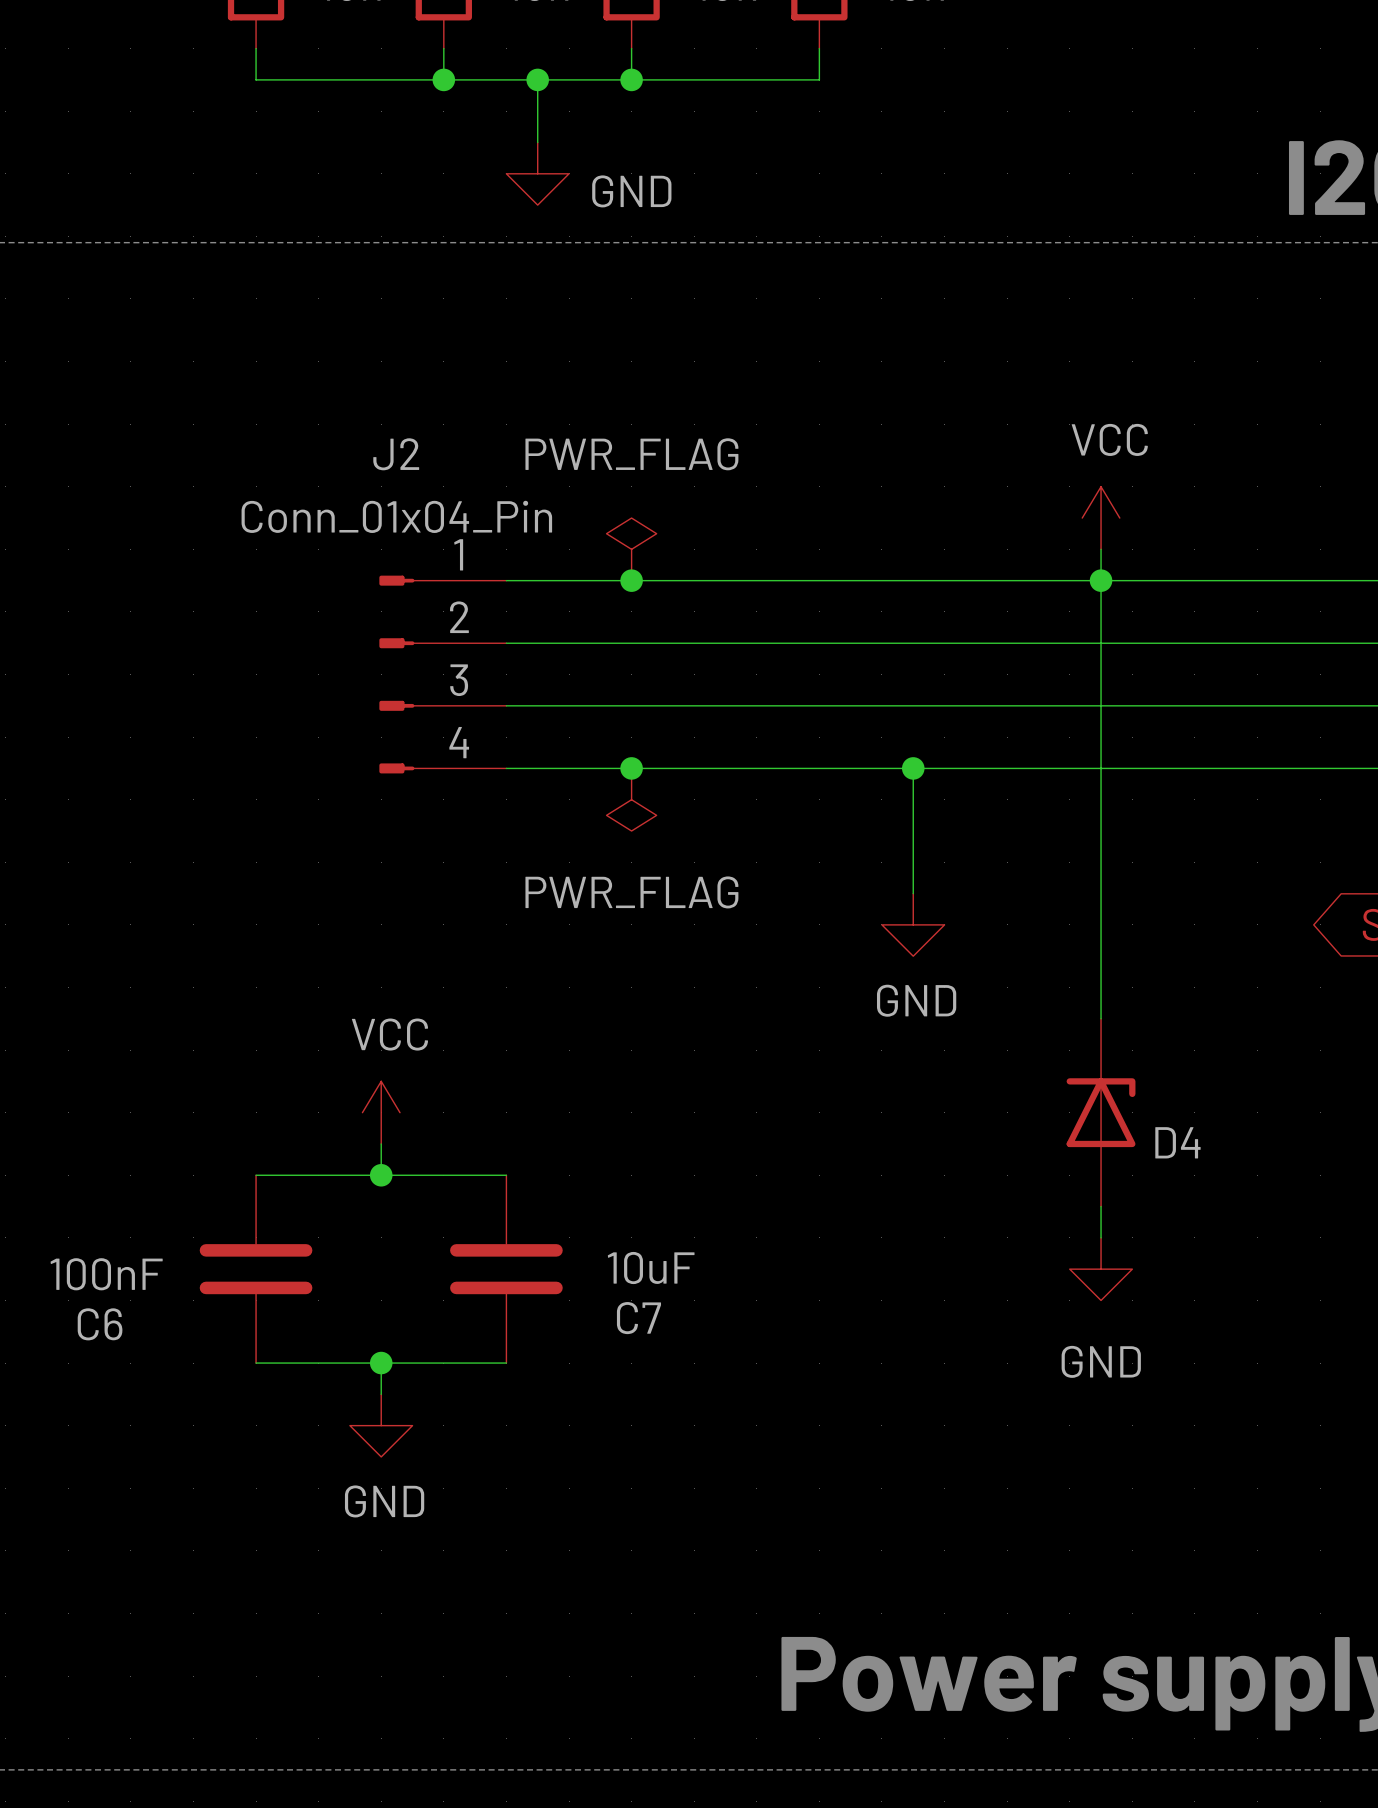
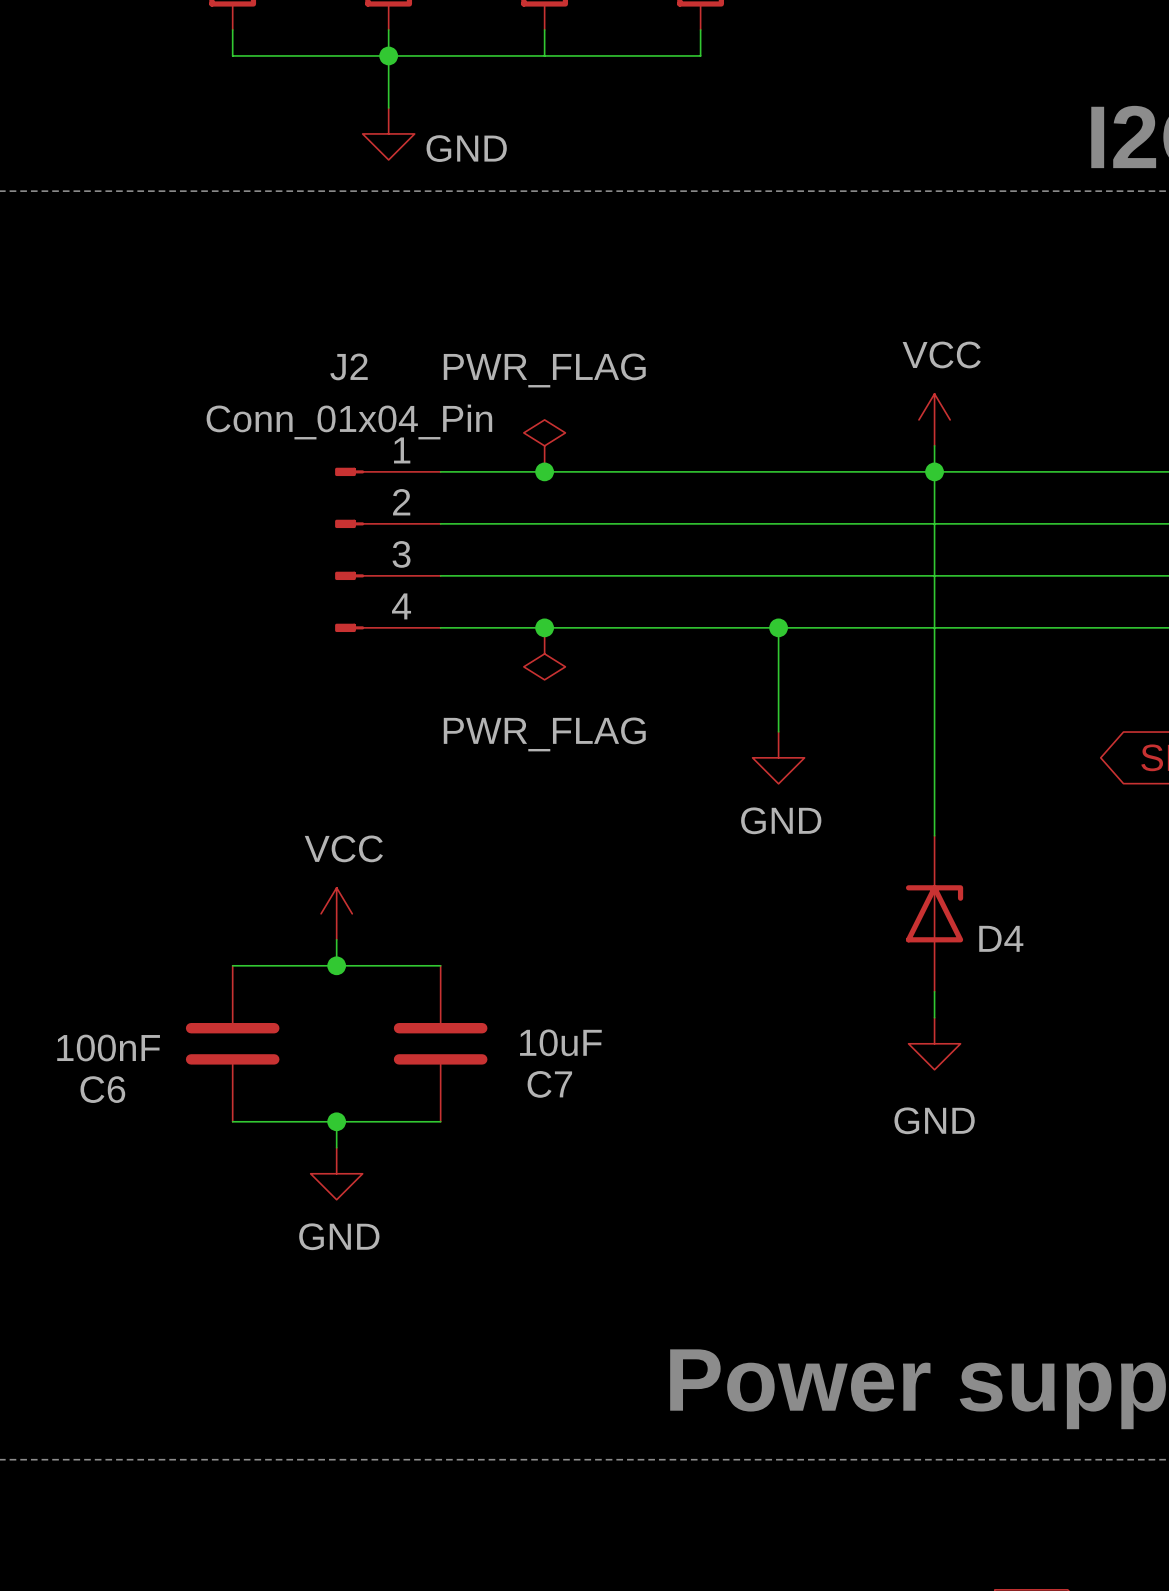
wire: (537, 79) (537, 142) -> (388, 55) (388, 107)
junction: (537, 79) -> none
junction: (631, 79) -> none
power symbol position: GND (537, 173) -> GND (388, 133)

